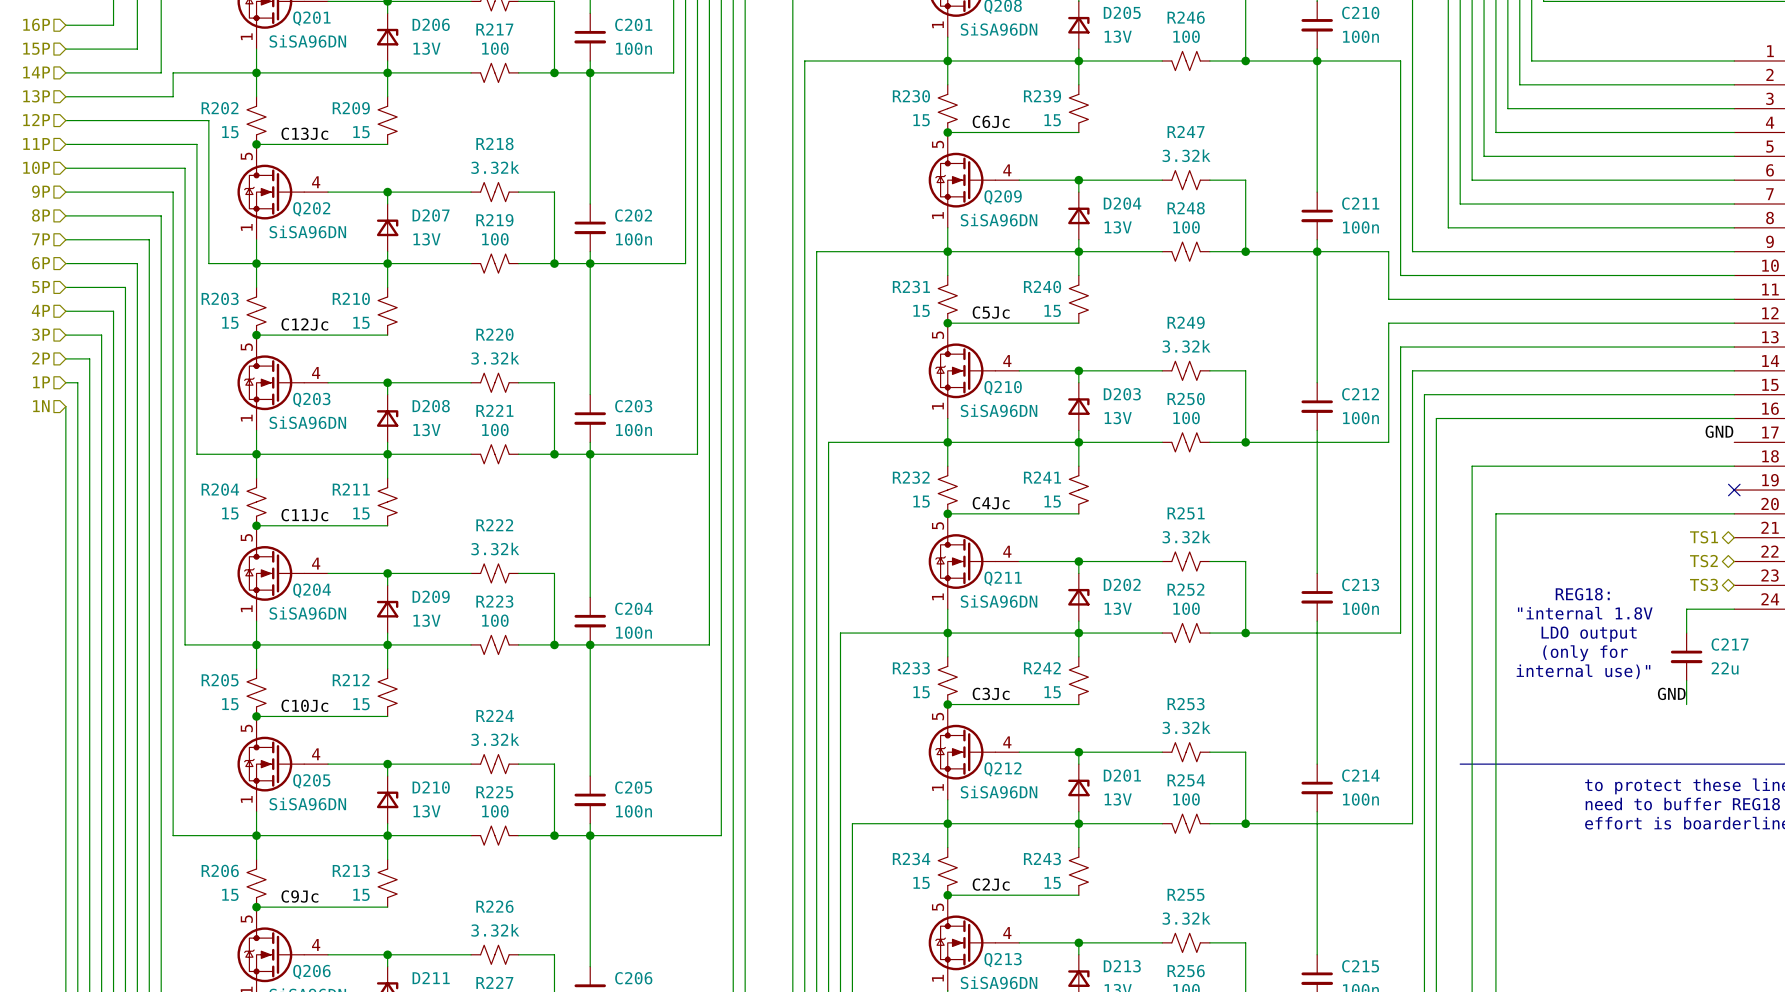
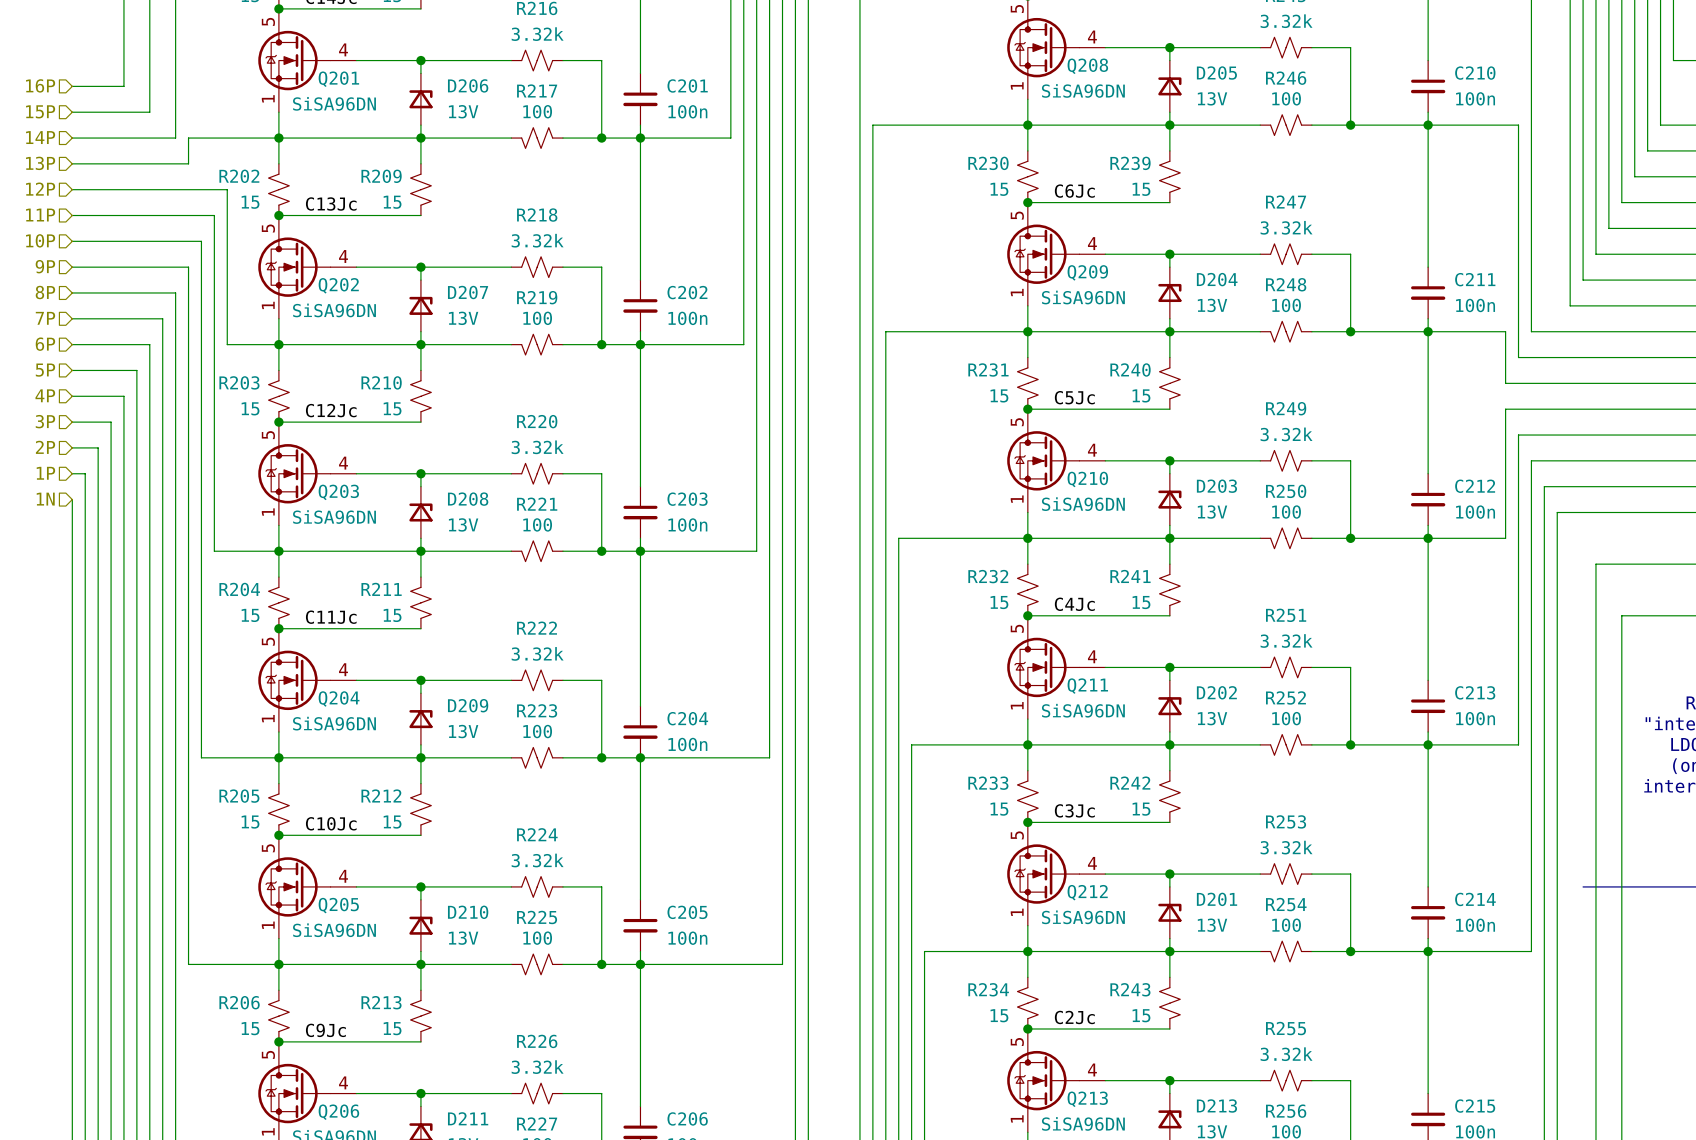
junction: none -> (1428, 538)
junction: none -> (1428, 744)
junction: none -> (1428, 951)

